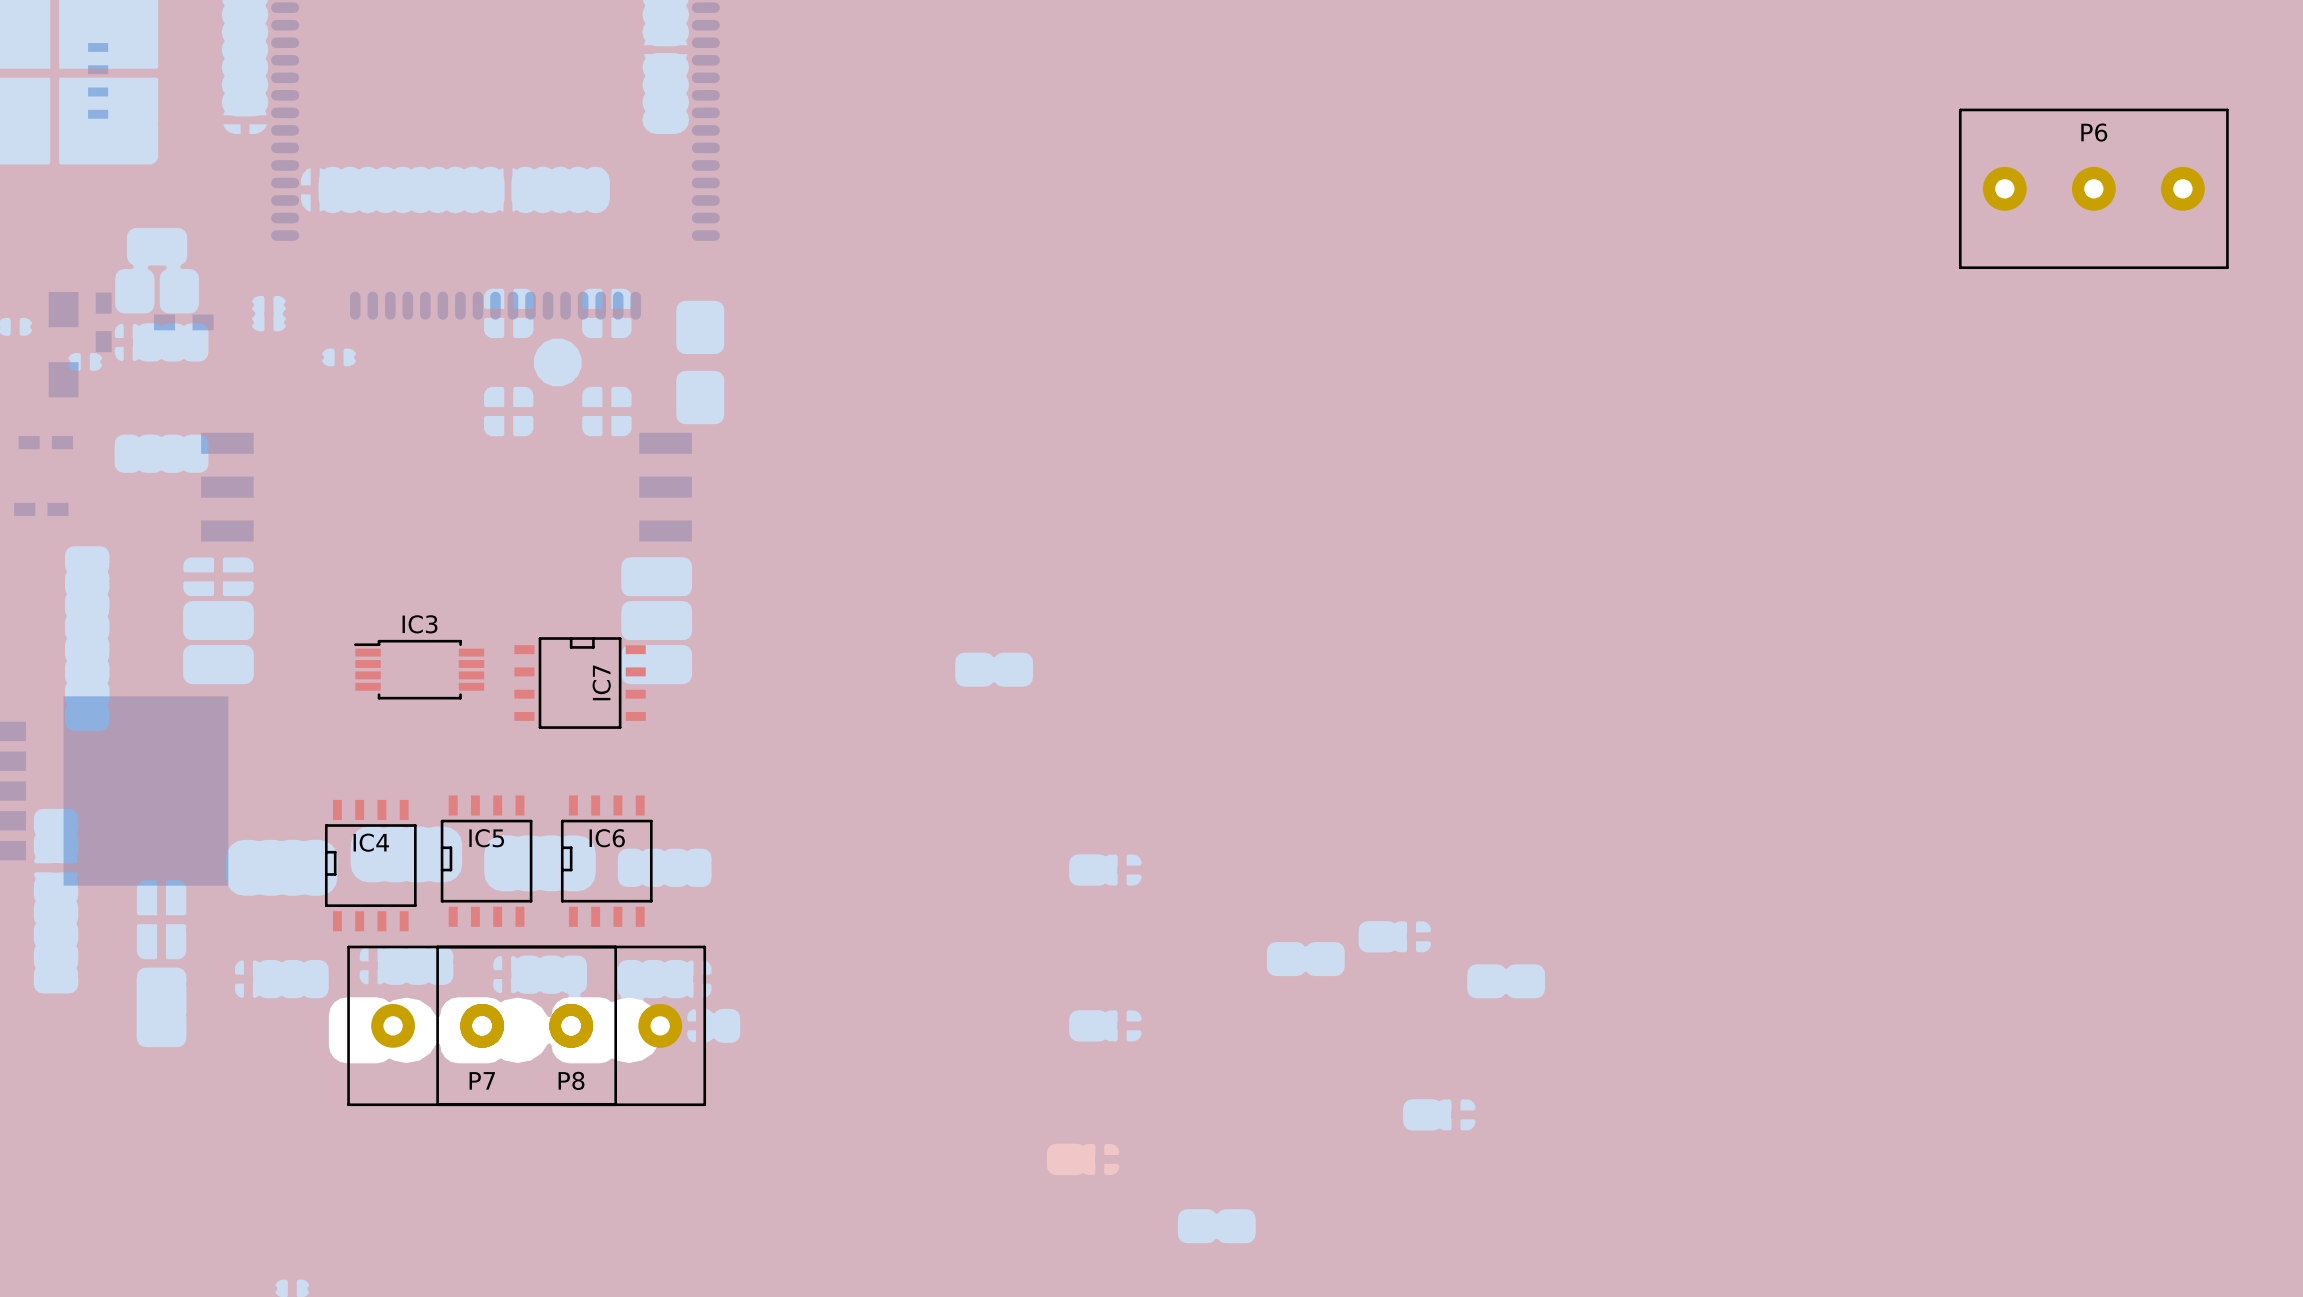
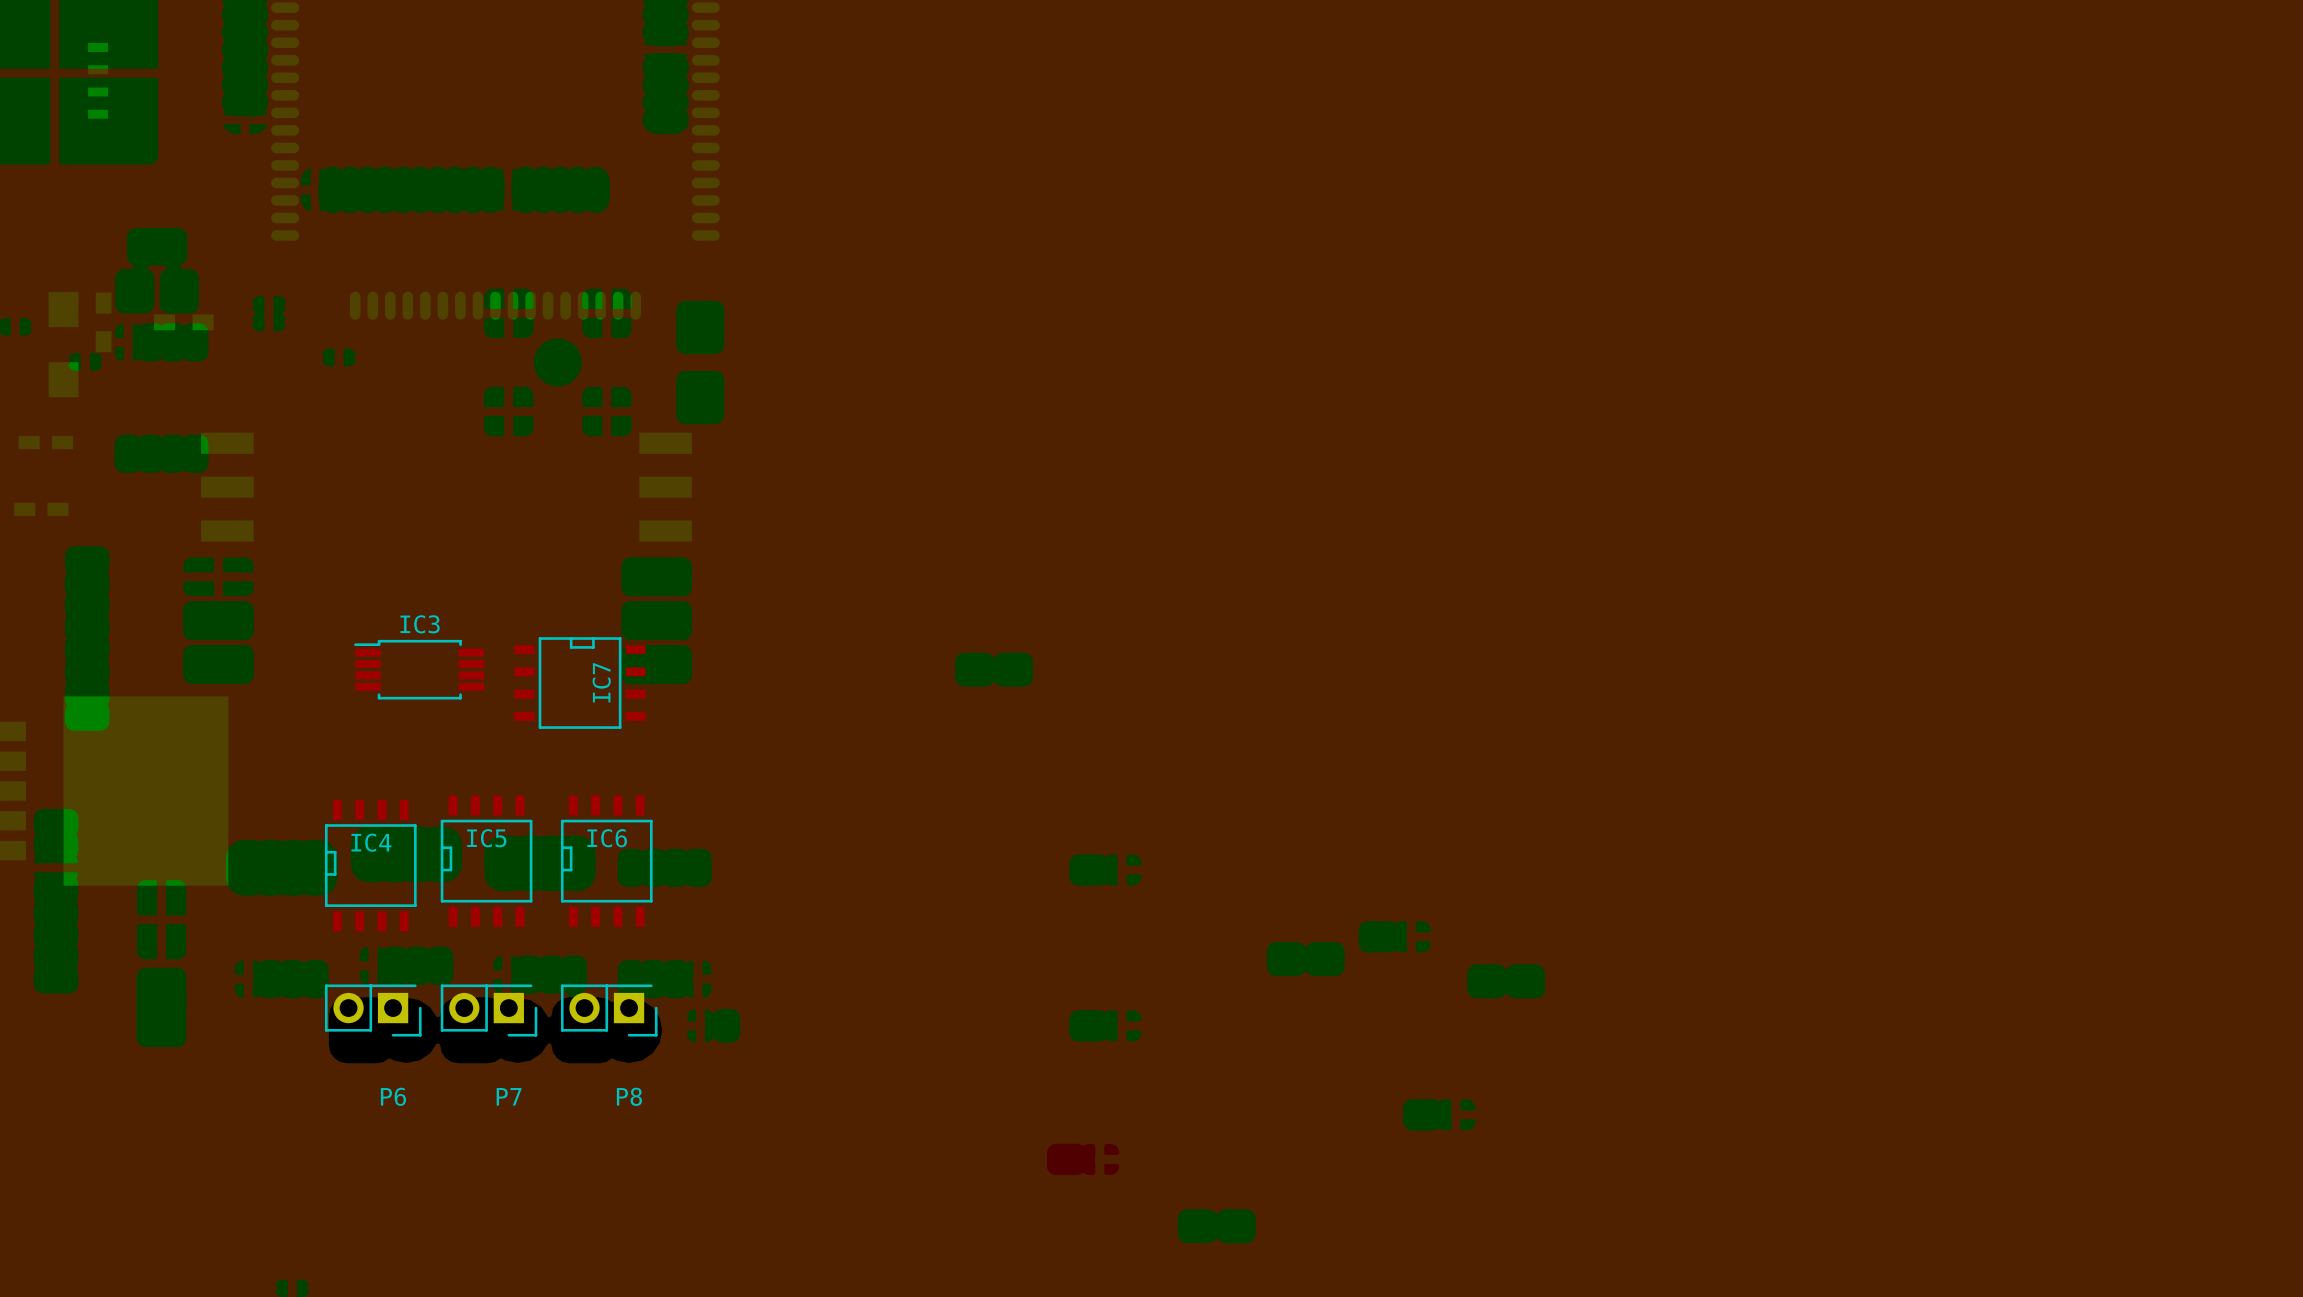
P6 footprint: [1958, 108, 2229, 270] -> [324, 984, 422, 1037]
P6 name position: P6 (2094, 132) -> P6 (393, 1096)
P7 footprint: [347, 945, 618, 1107] -> [440, 984, 538, 1037]
P8 footprint: [436, 945, 707, 1107] -> [560, 984, 658, 1037]
P7 name position: P7 (482, 1080) -> P7 (509, 1096)
P8 name position: P8 (571, 1080) -> P8 (629, 1096)

